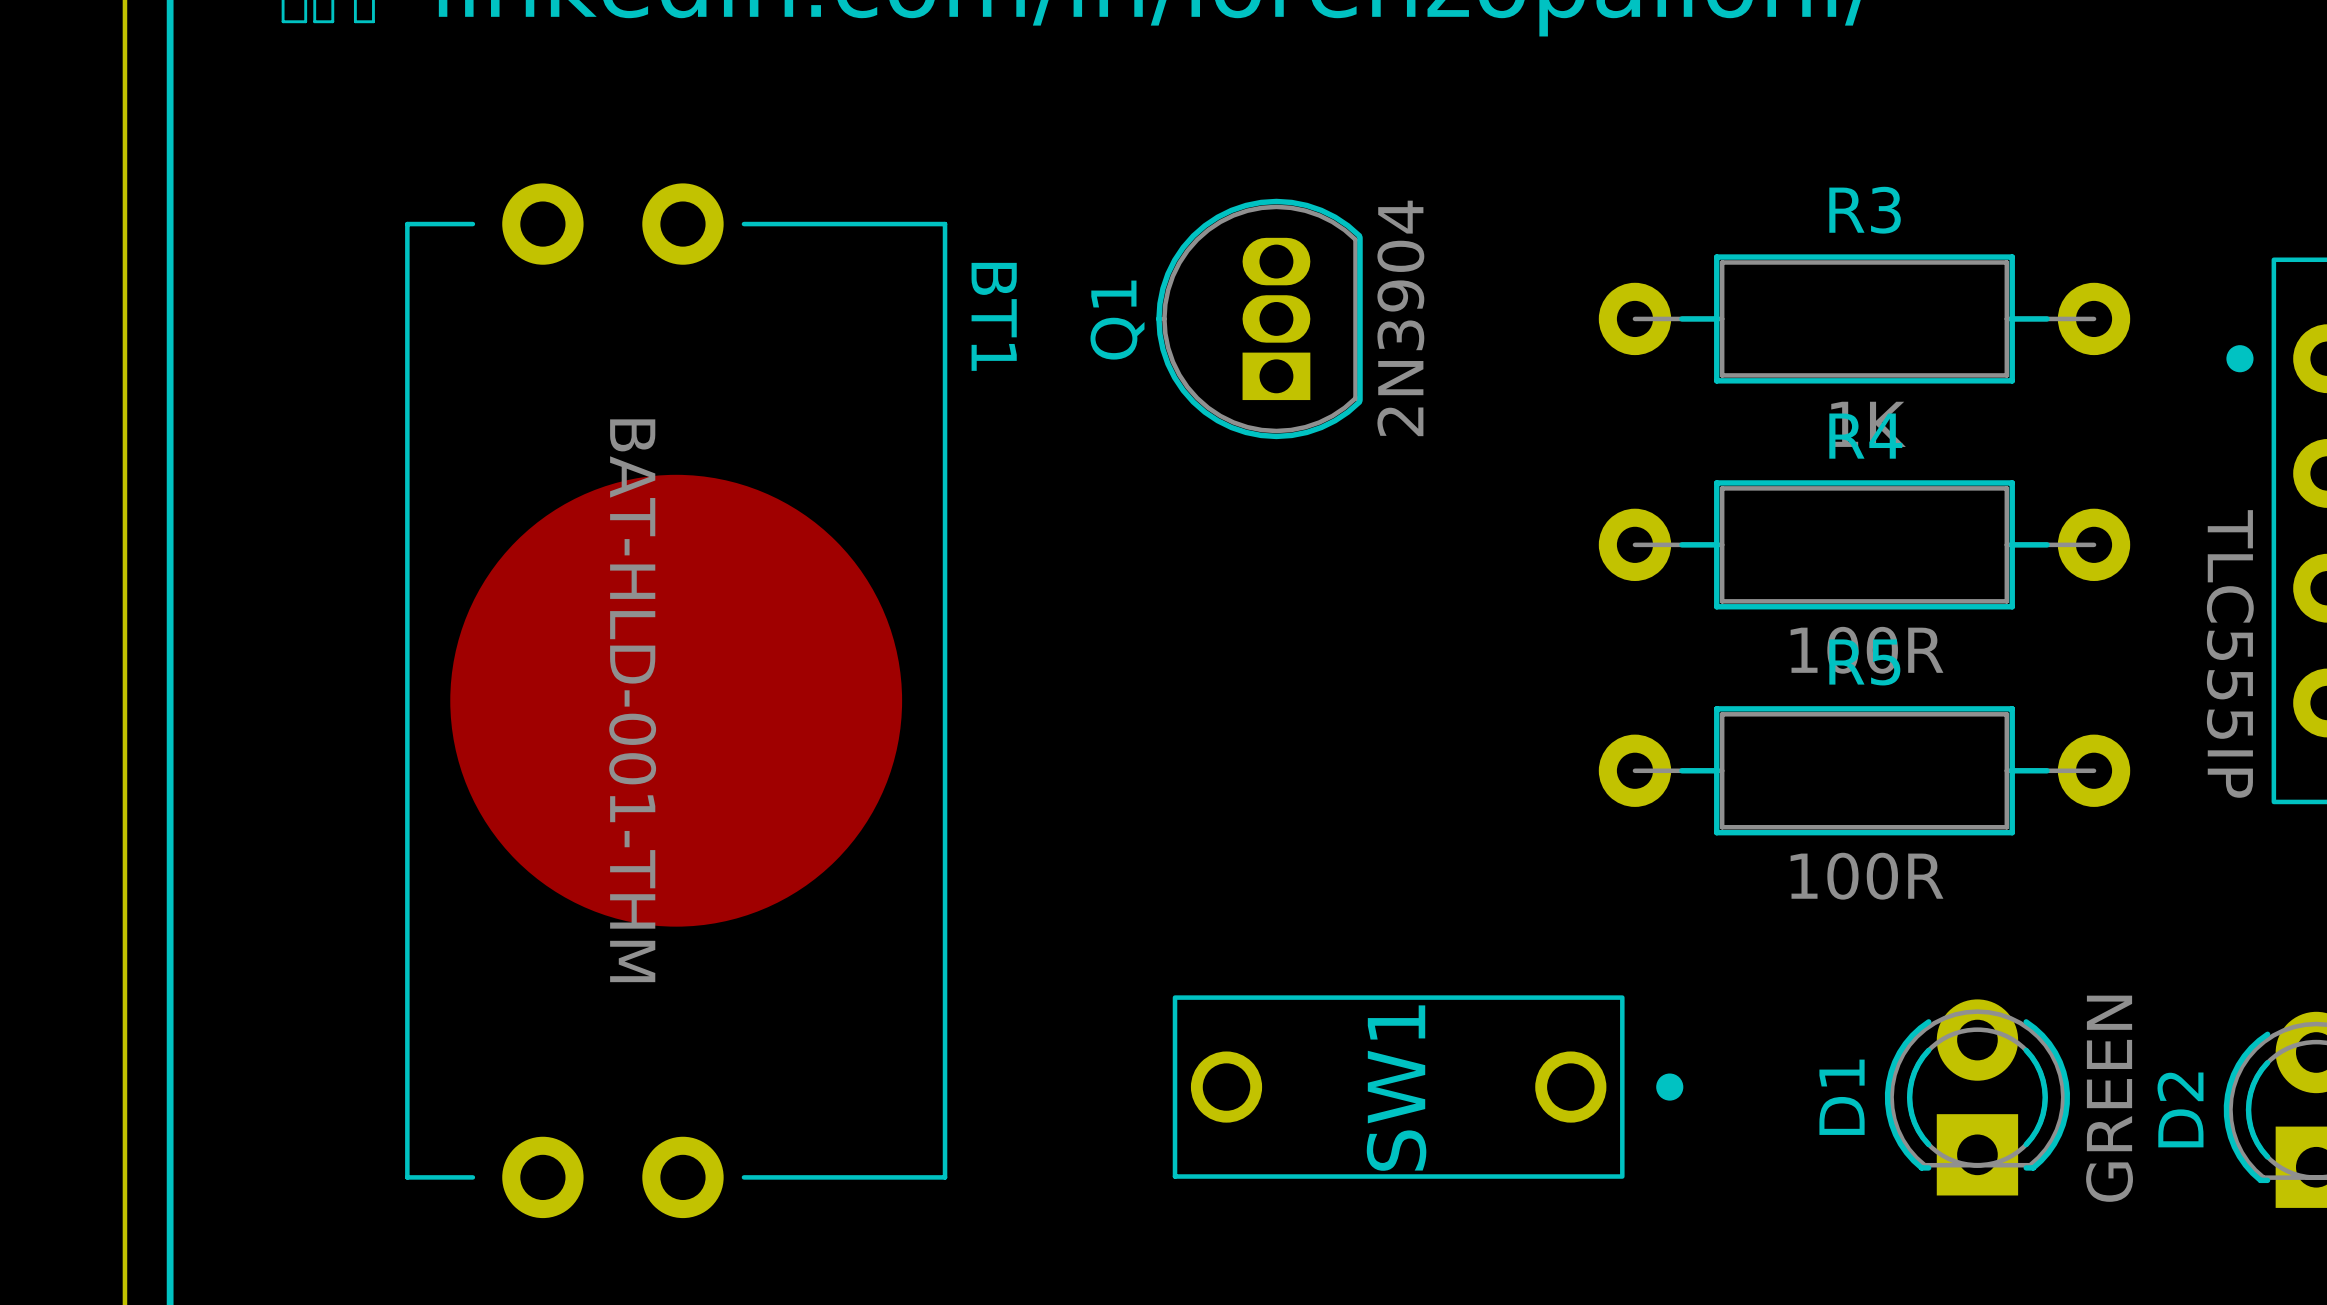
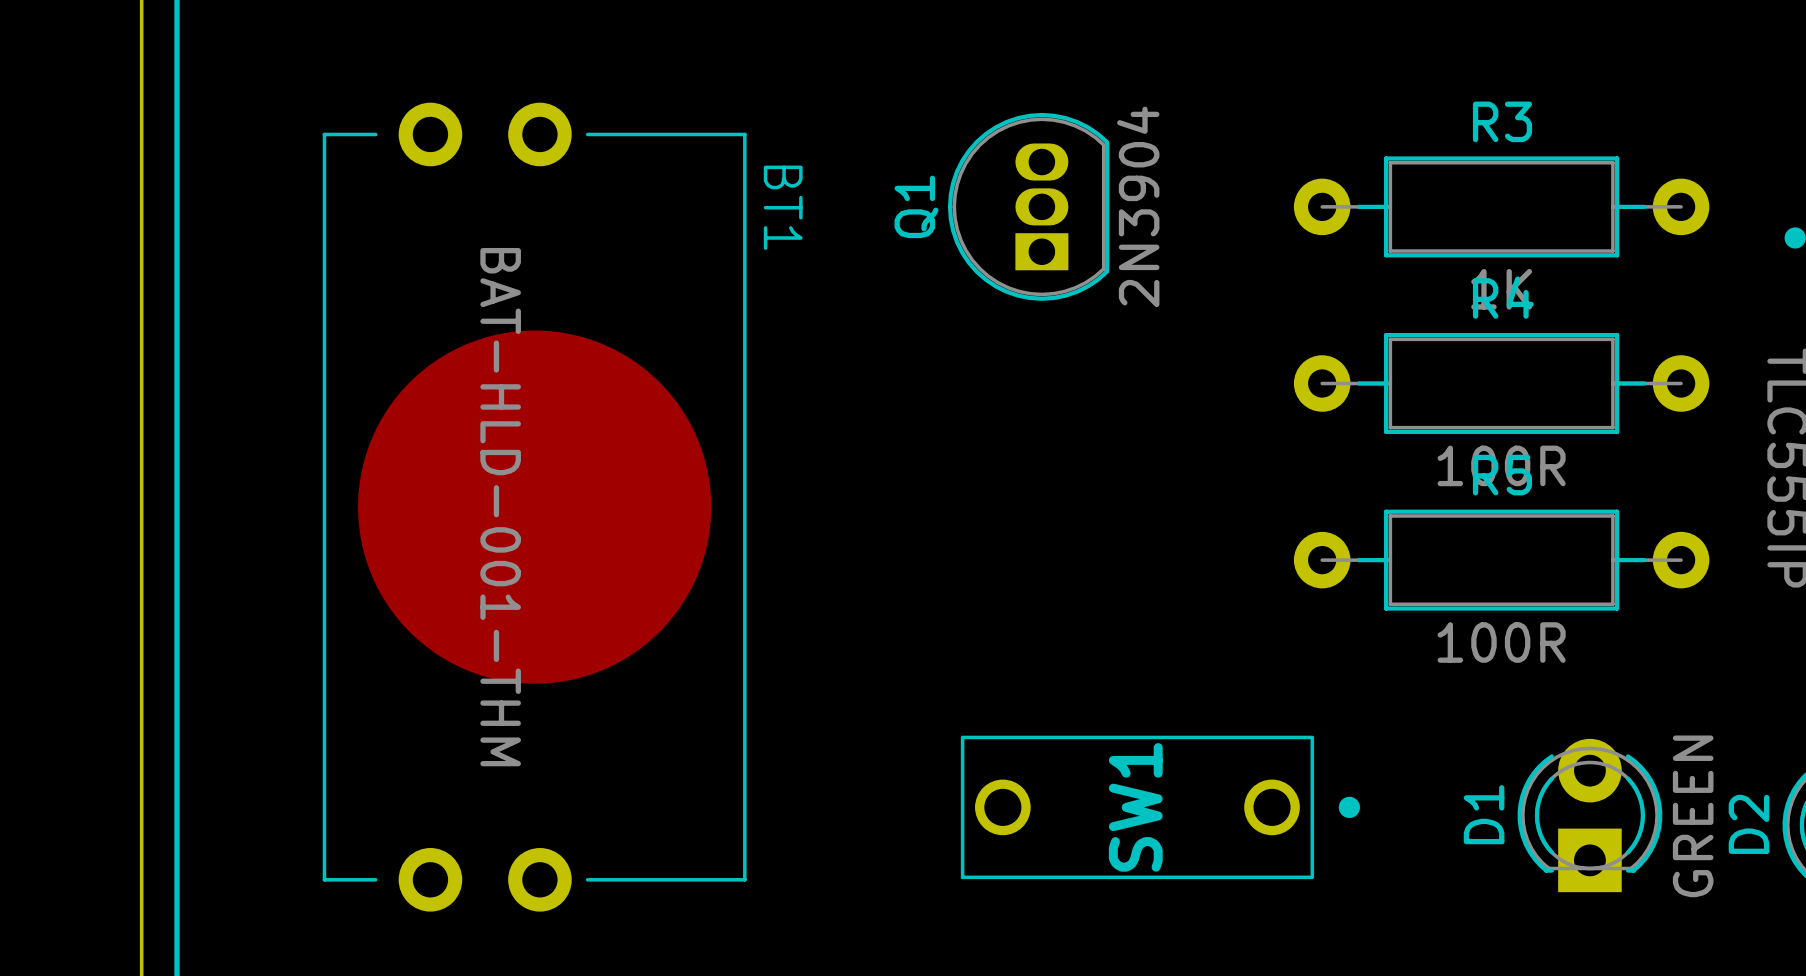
BT1 position: (676, 700) -> (534, 507)

